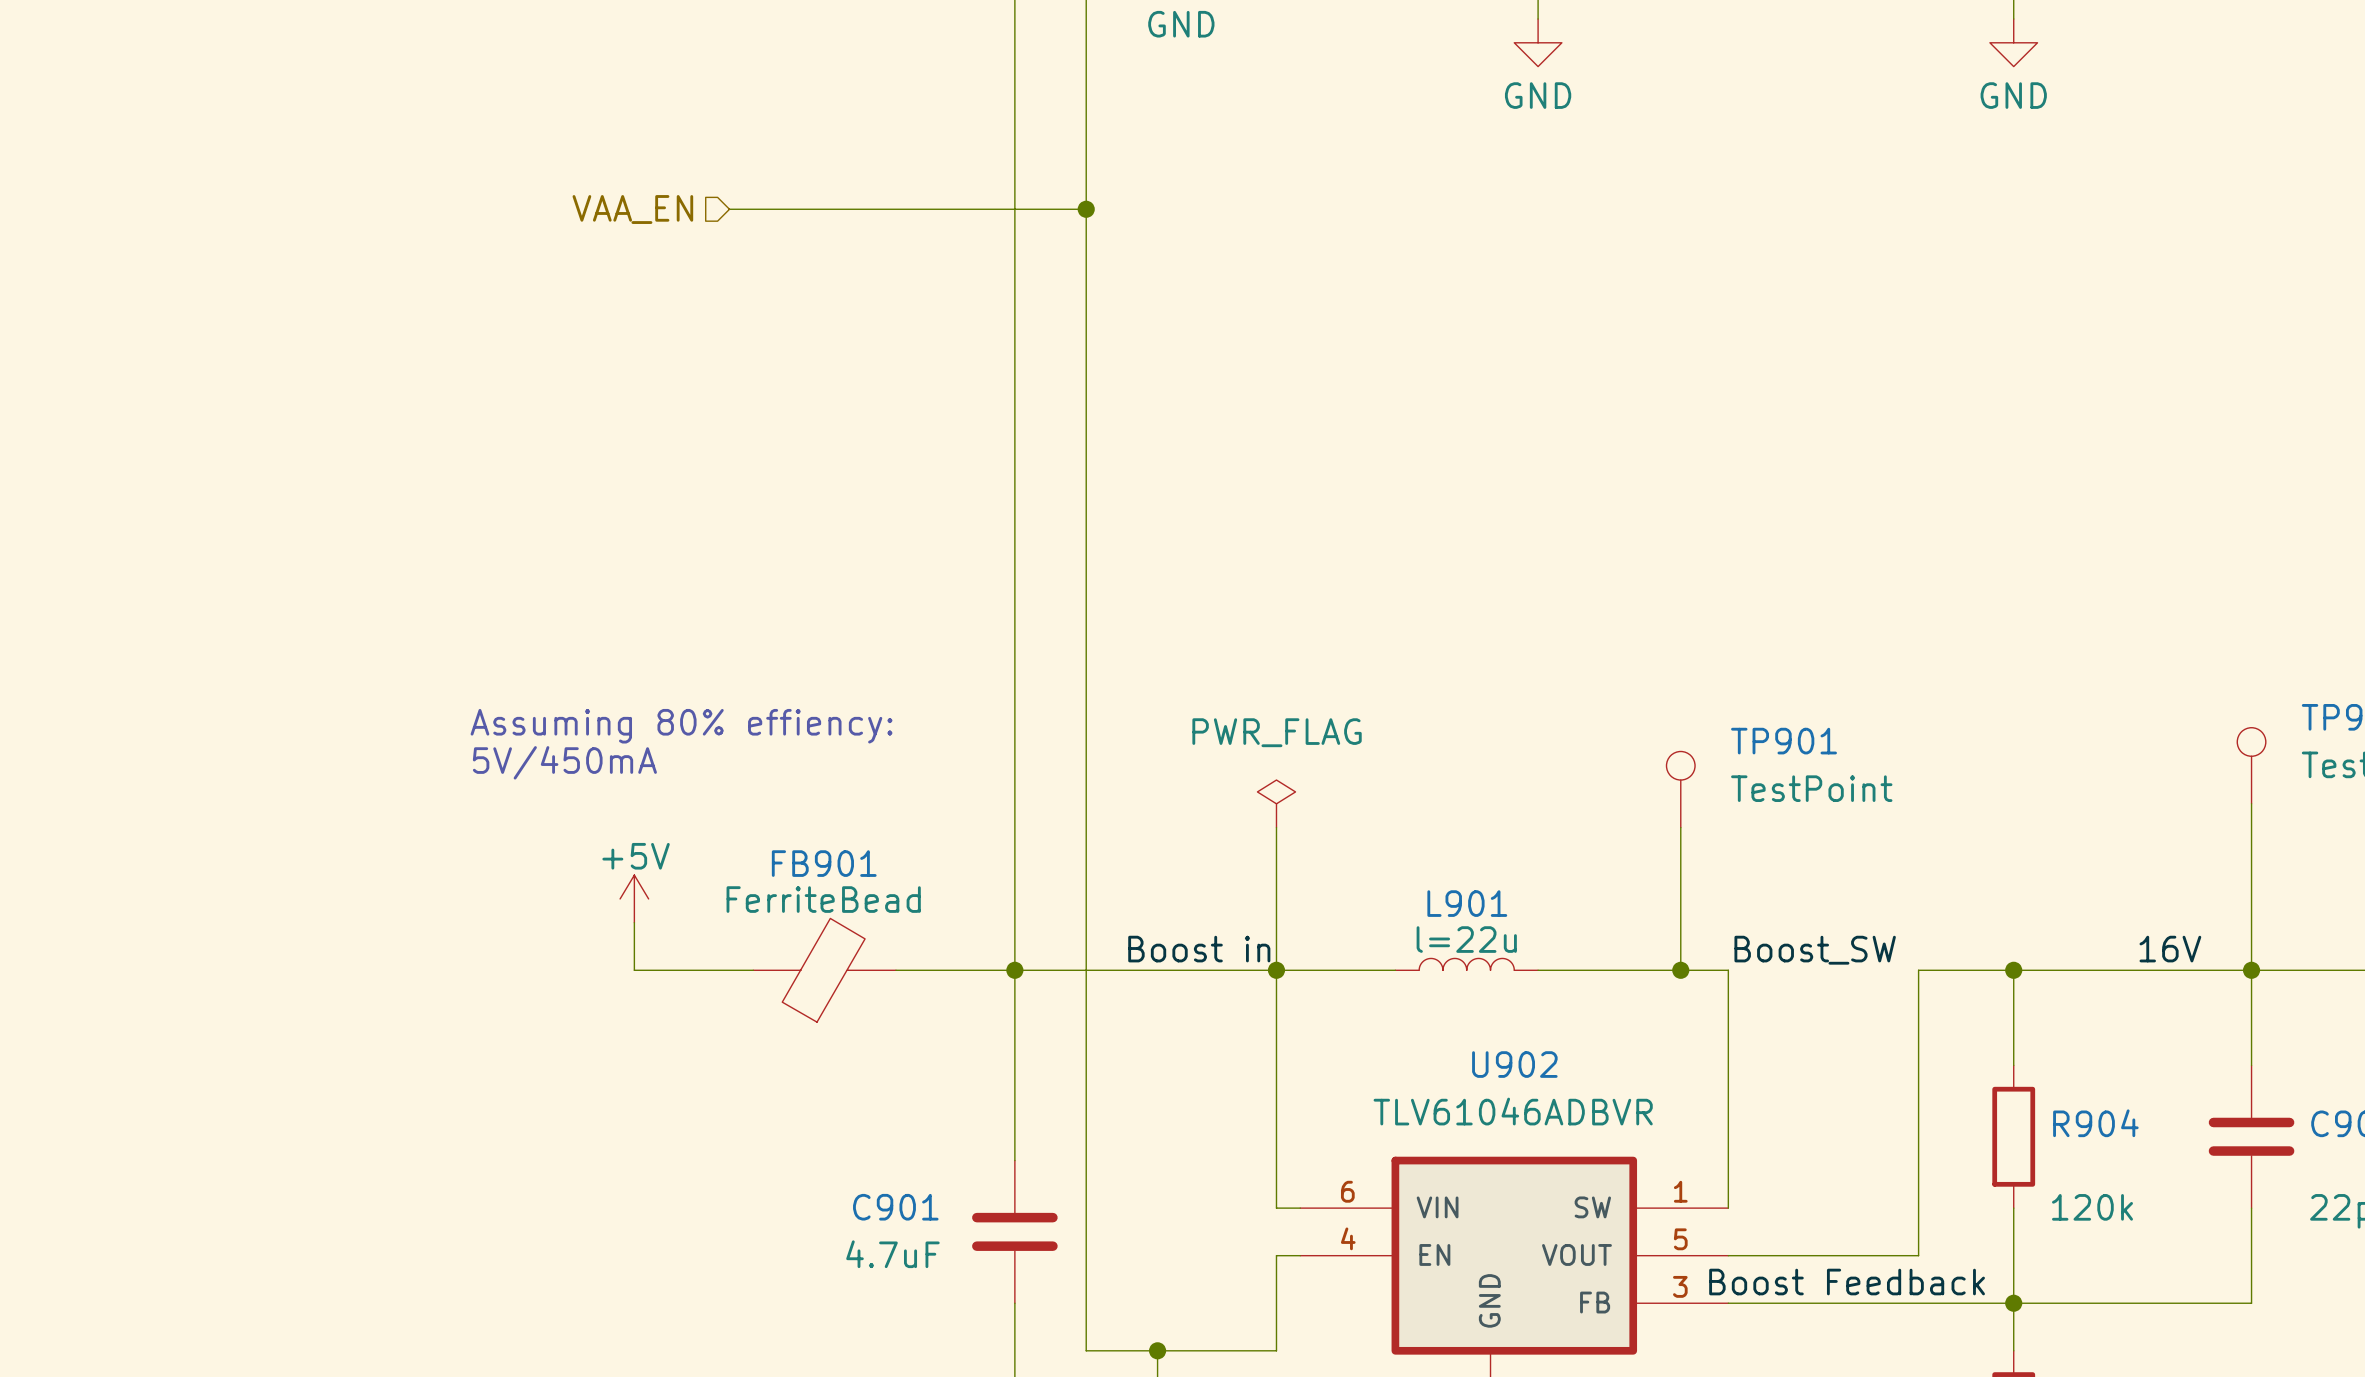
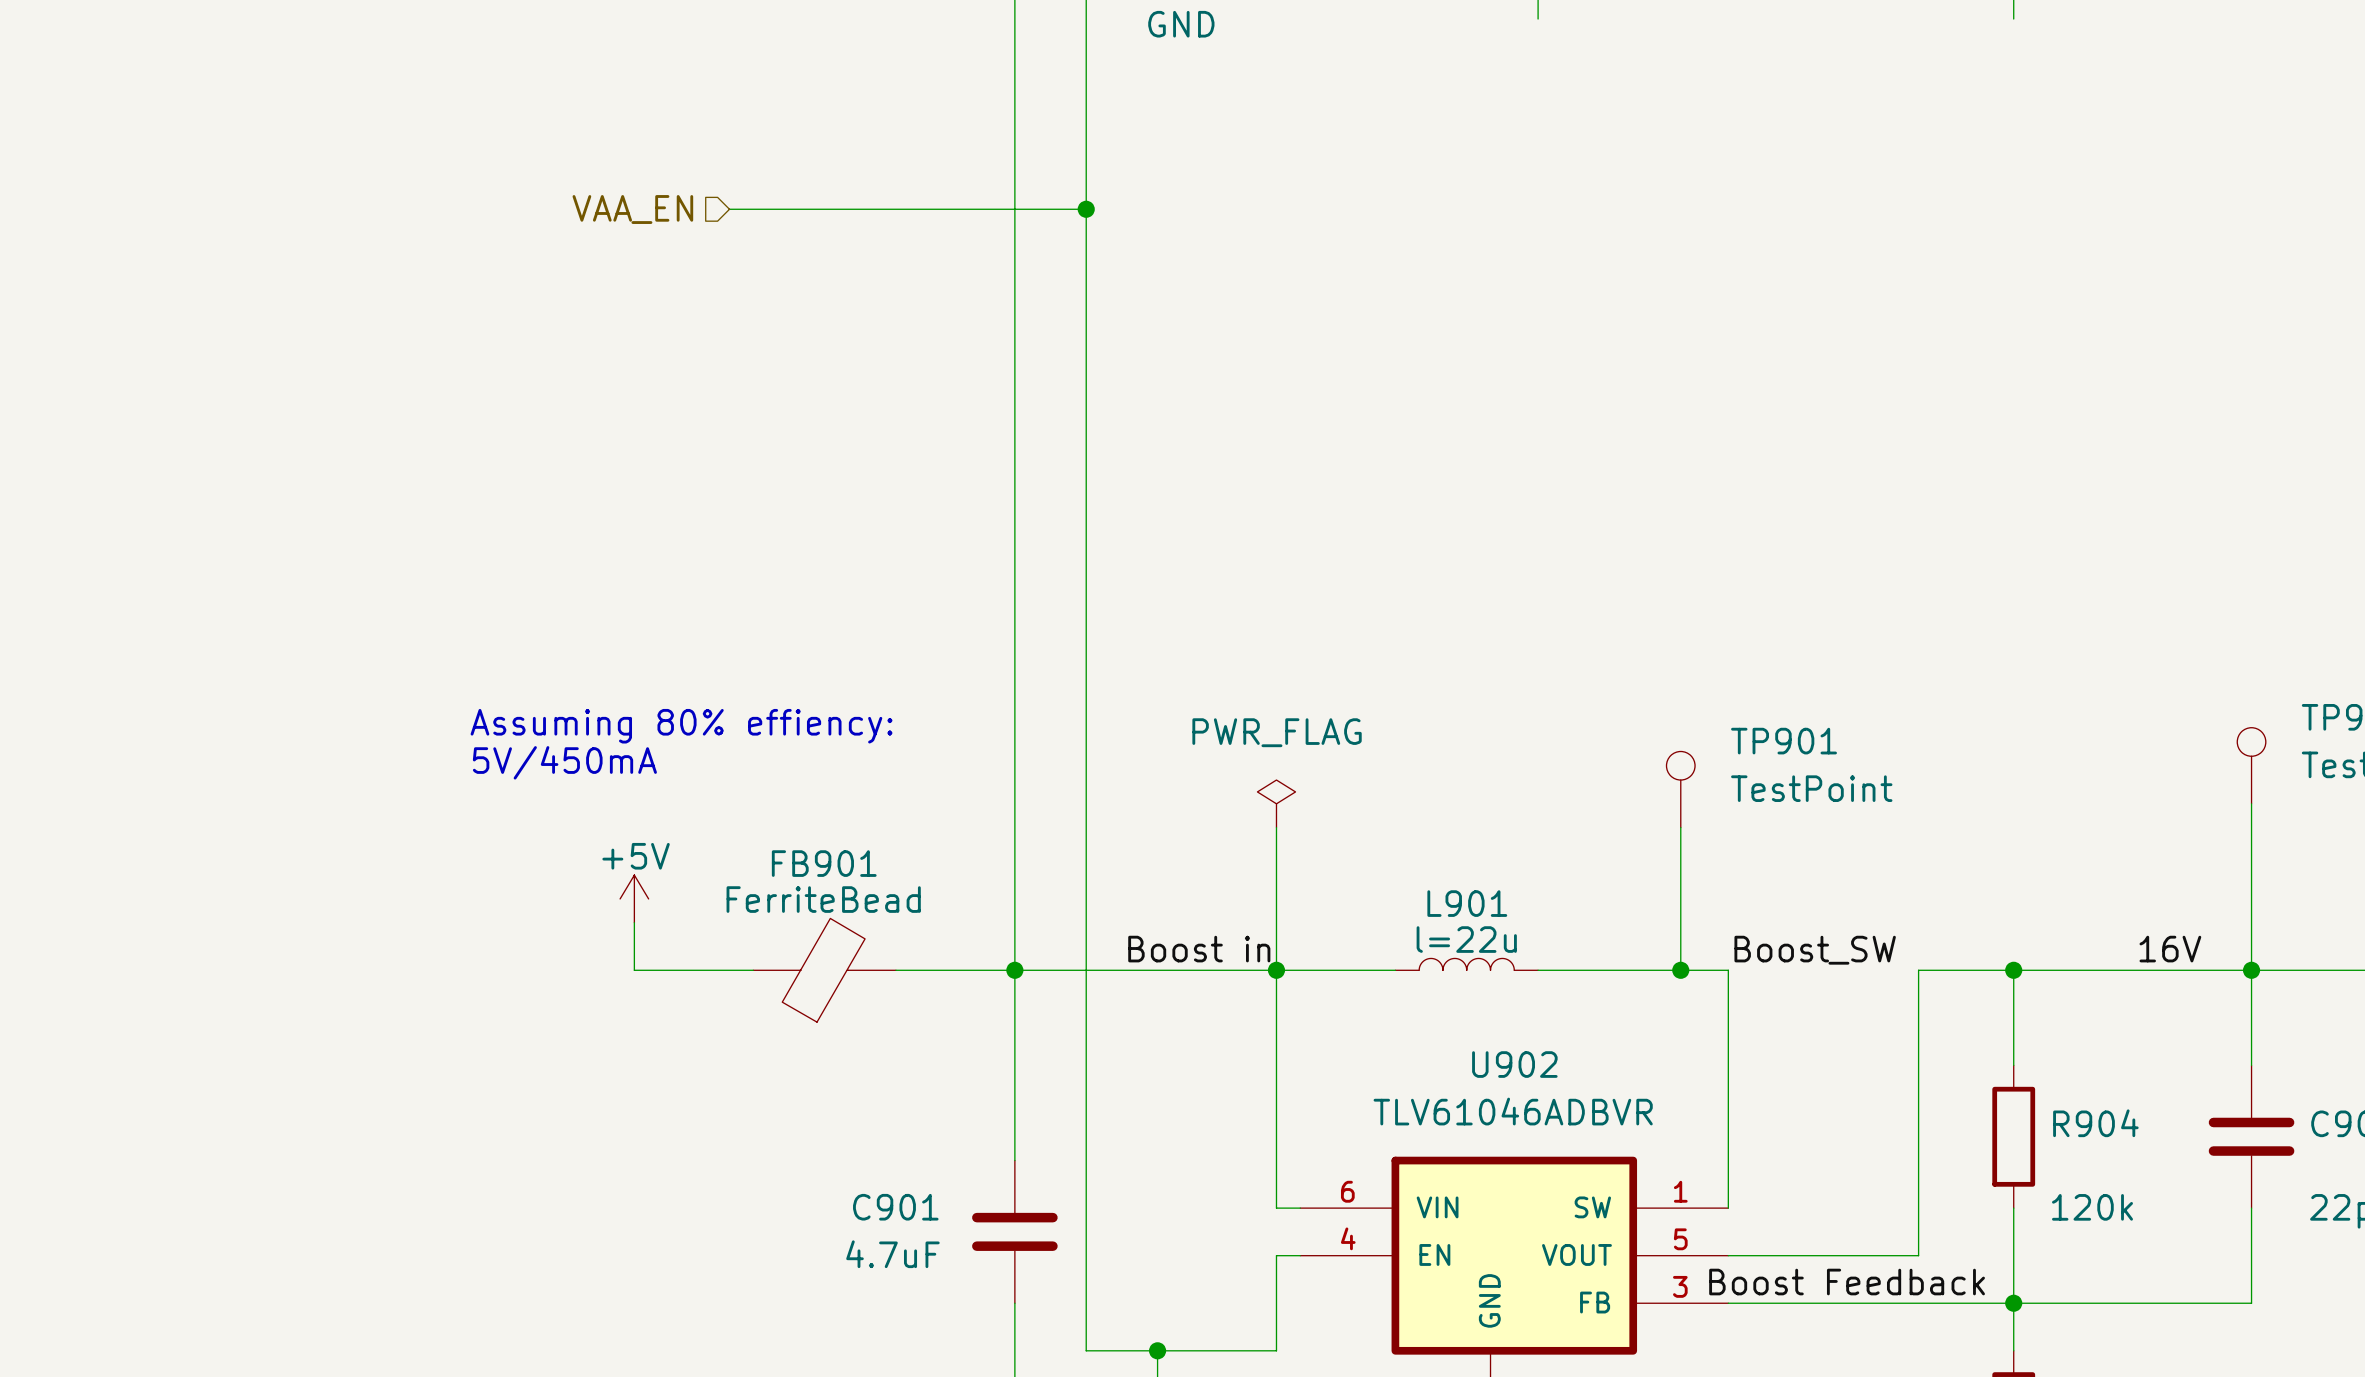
power symbol: GND (1538, 42) -> none
power symbol: GND (2013, 42) -> none

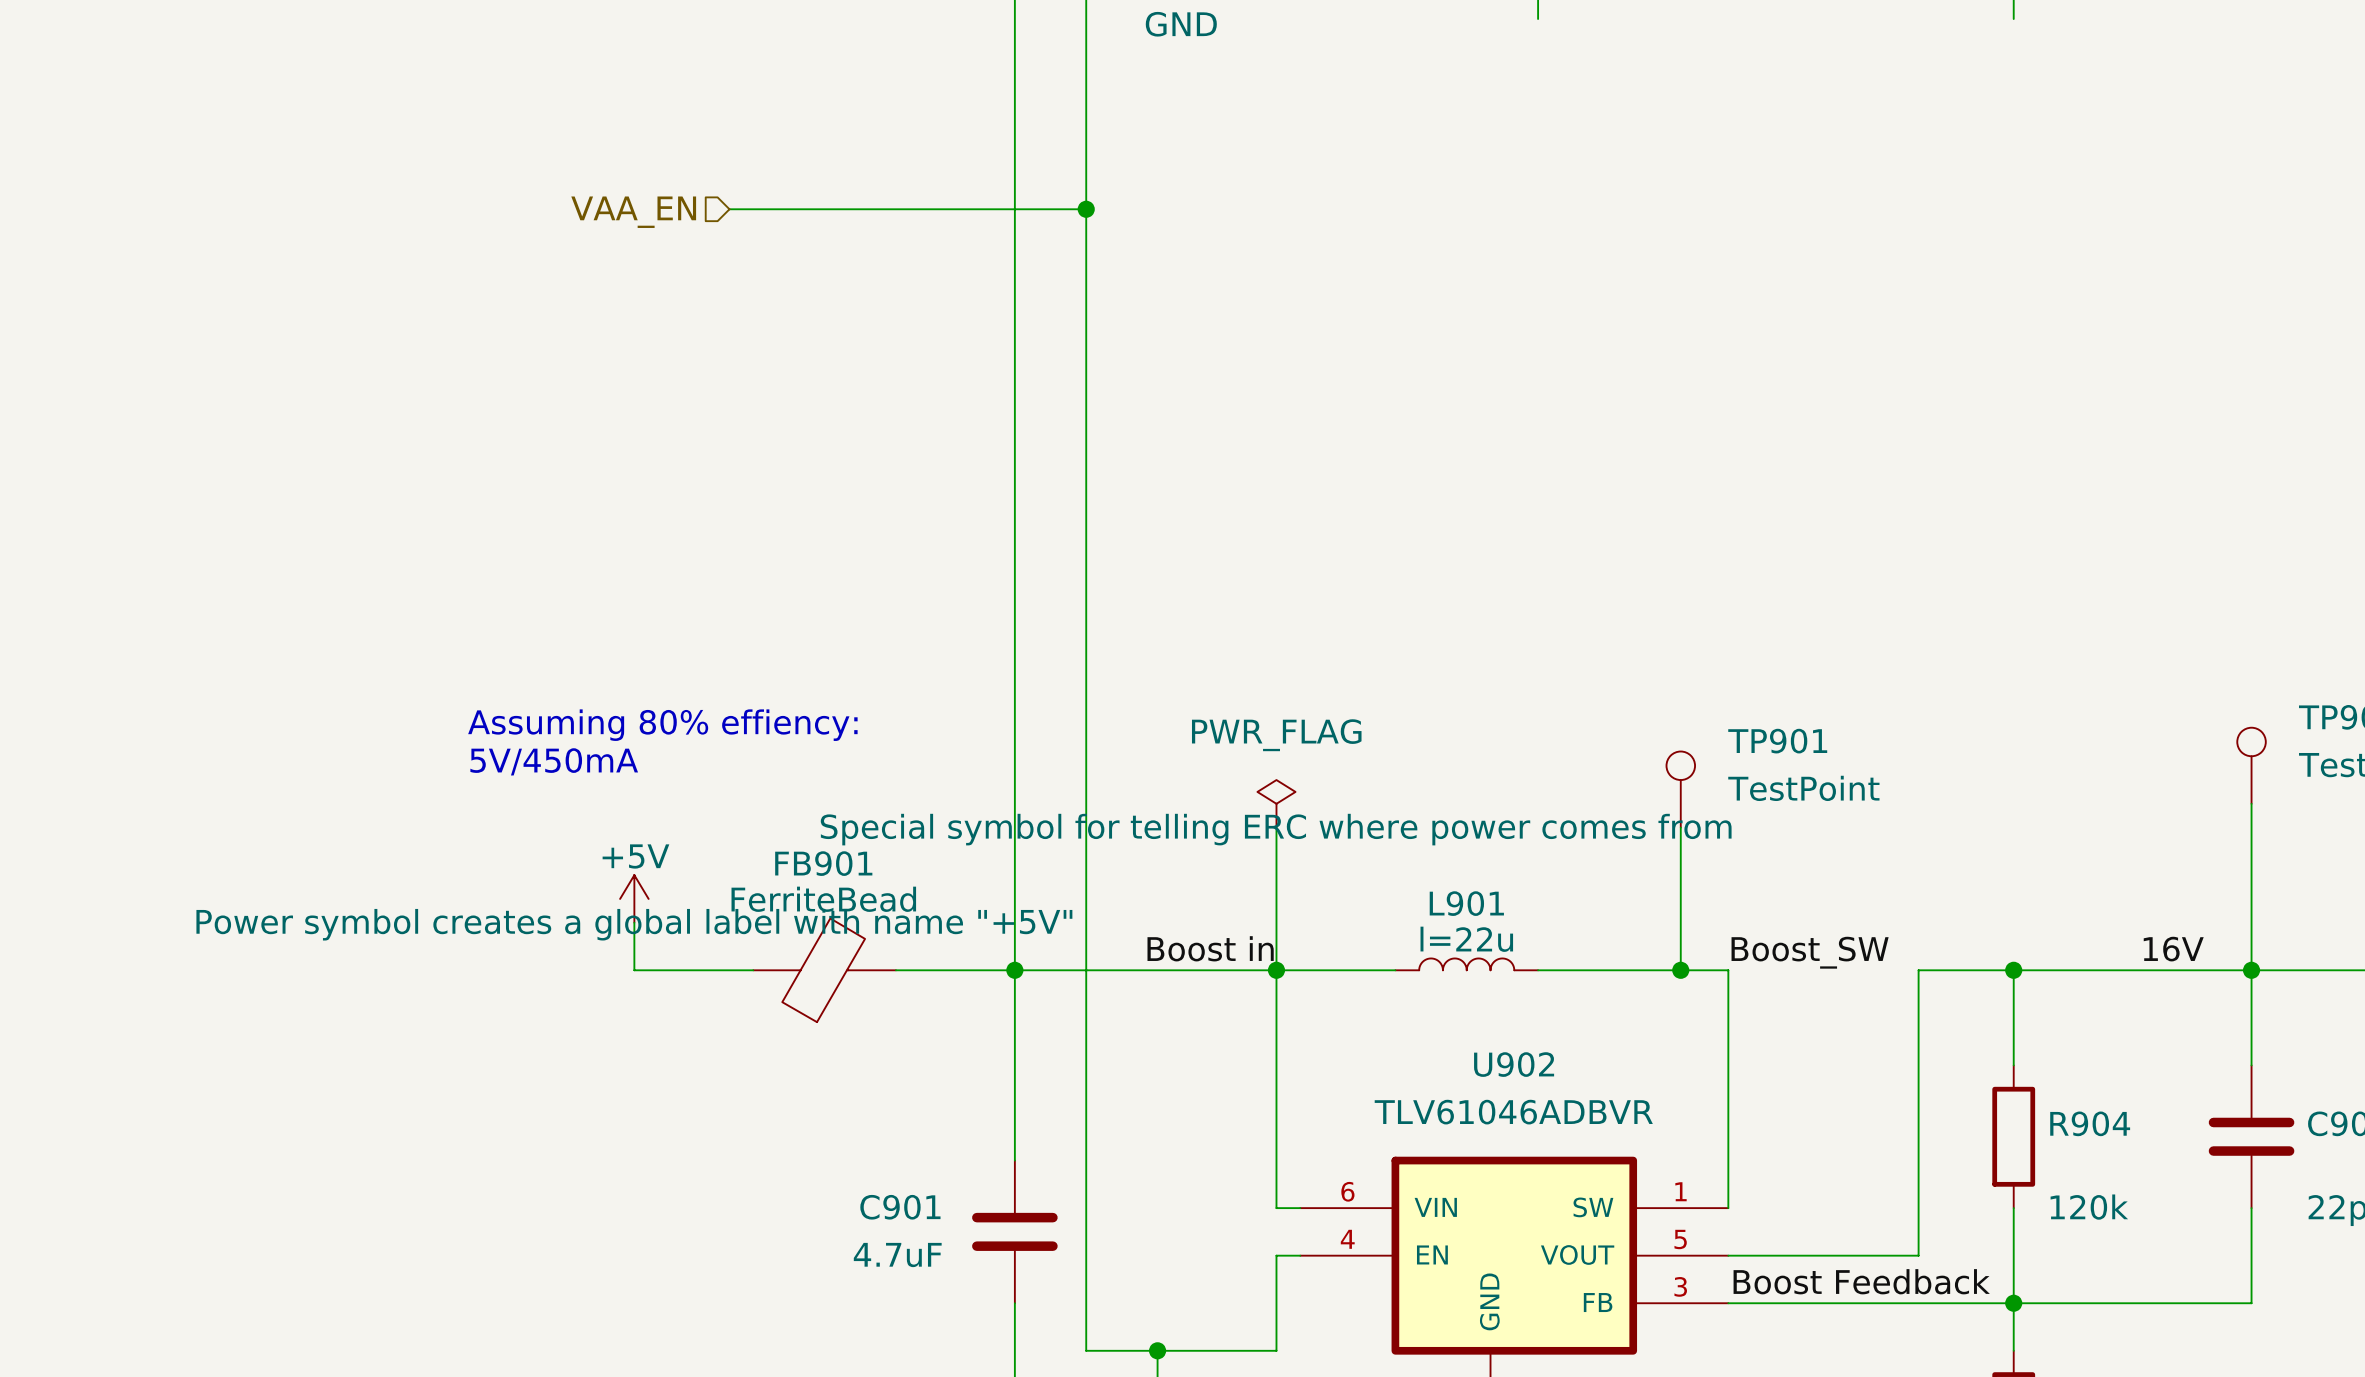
power symbol text: none -> Special symbol for telling ERC where power comes from (1276, 829)
power symbol text: none -> Power symbol creates a global label with name "+5V" (634, 924)

